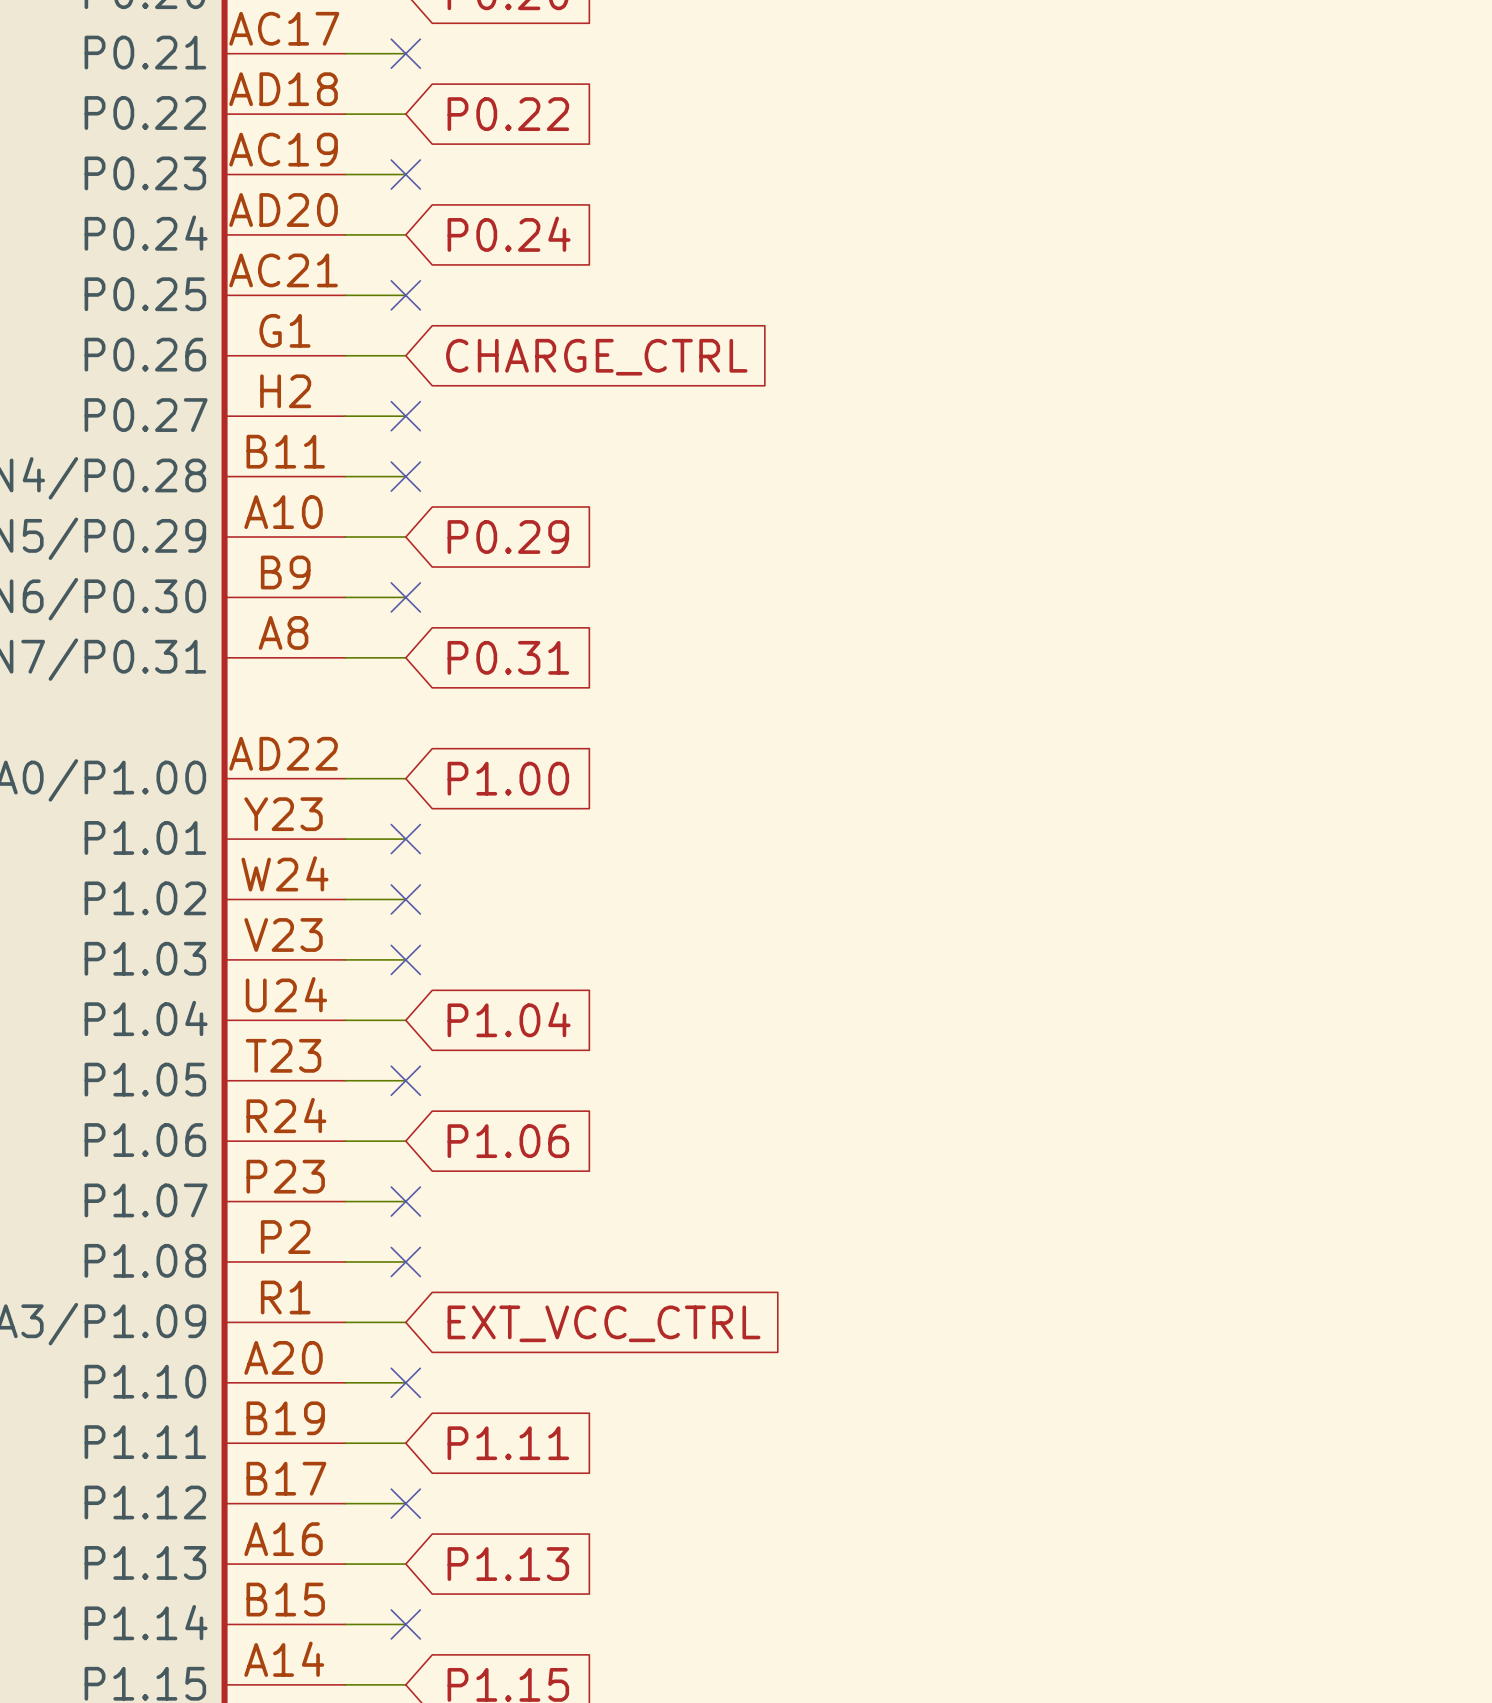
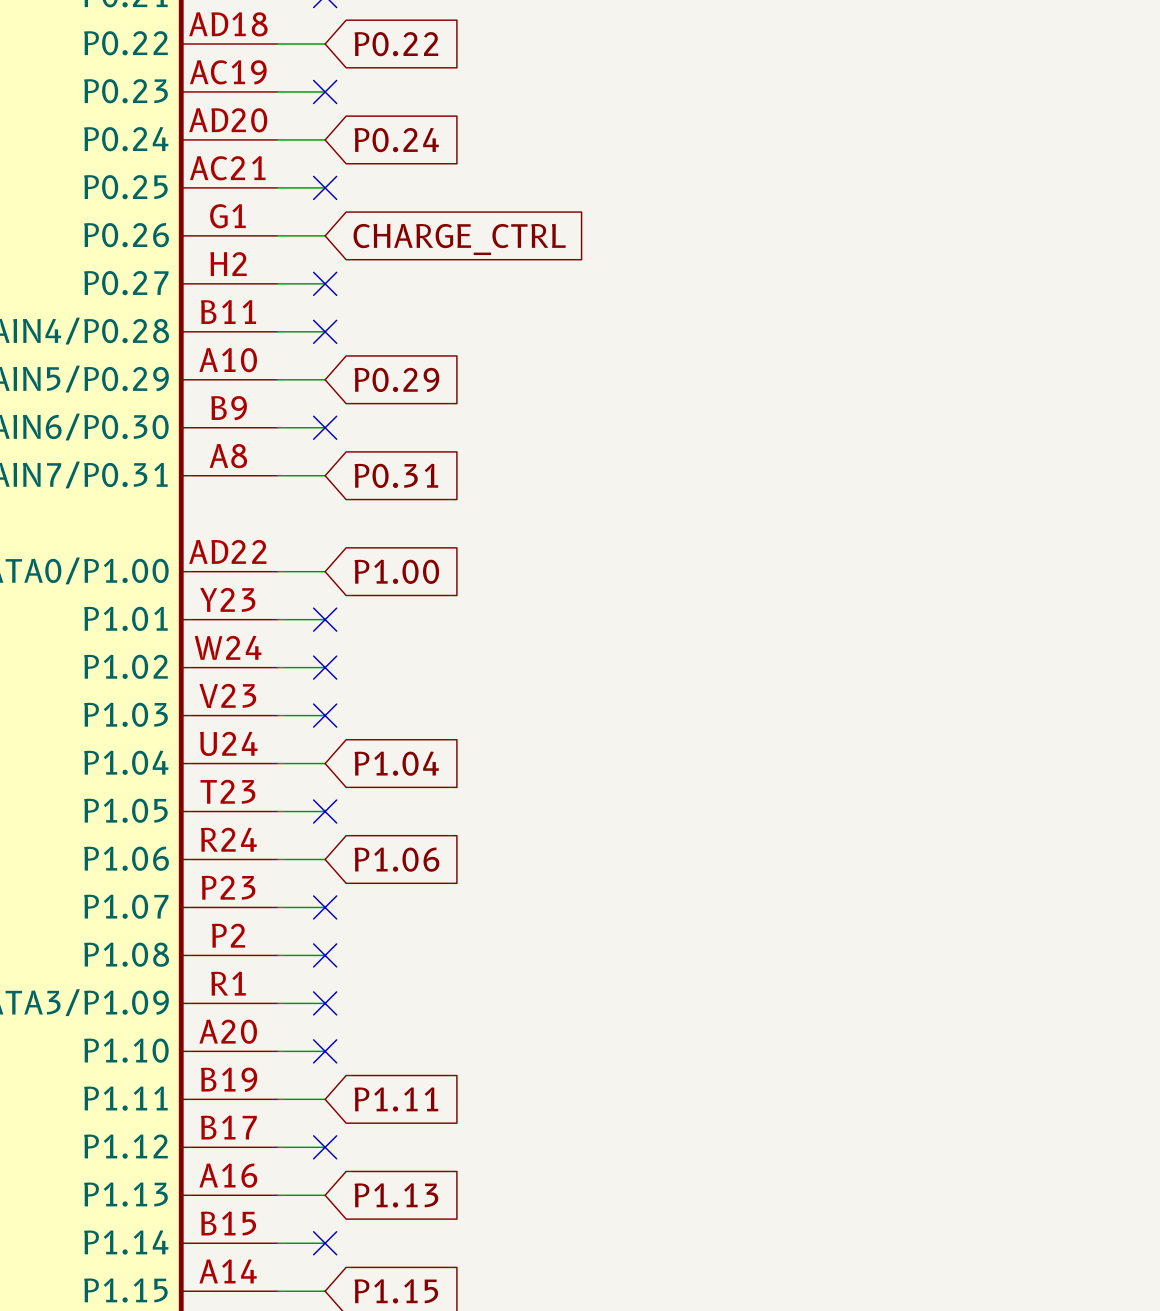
no-connect mark: none -> (325, 1003)
global label: EXT_VCC_CTRL (603, 1323) -> none

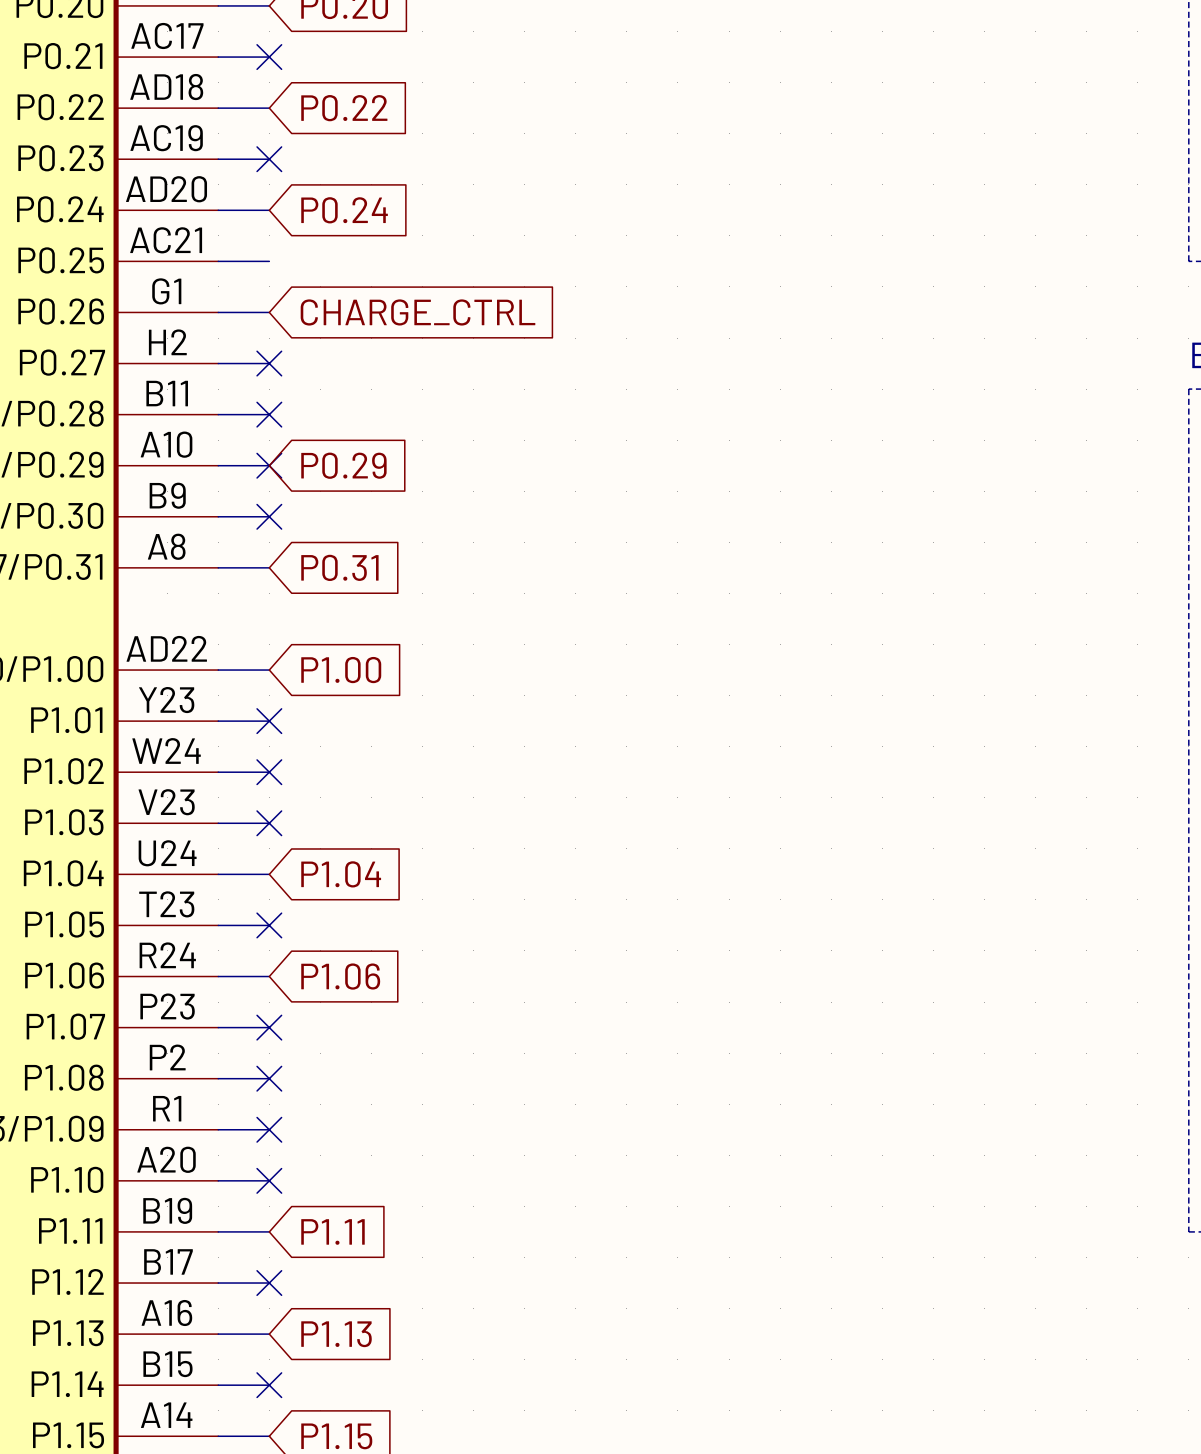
no-connect mark: (325, 187) -> none
no-connect mark: none -> (269, 465)

